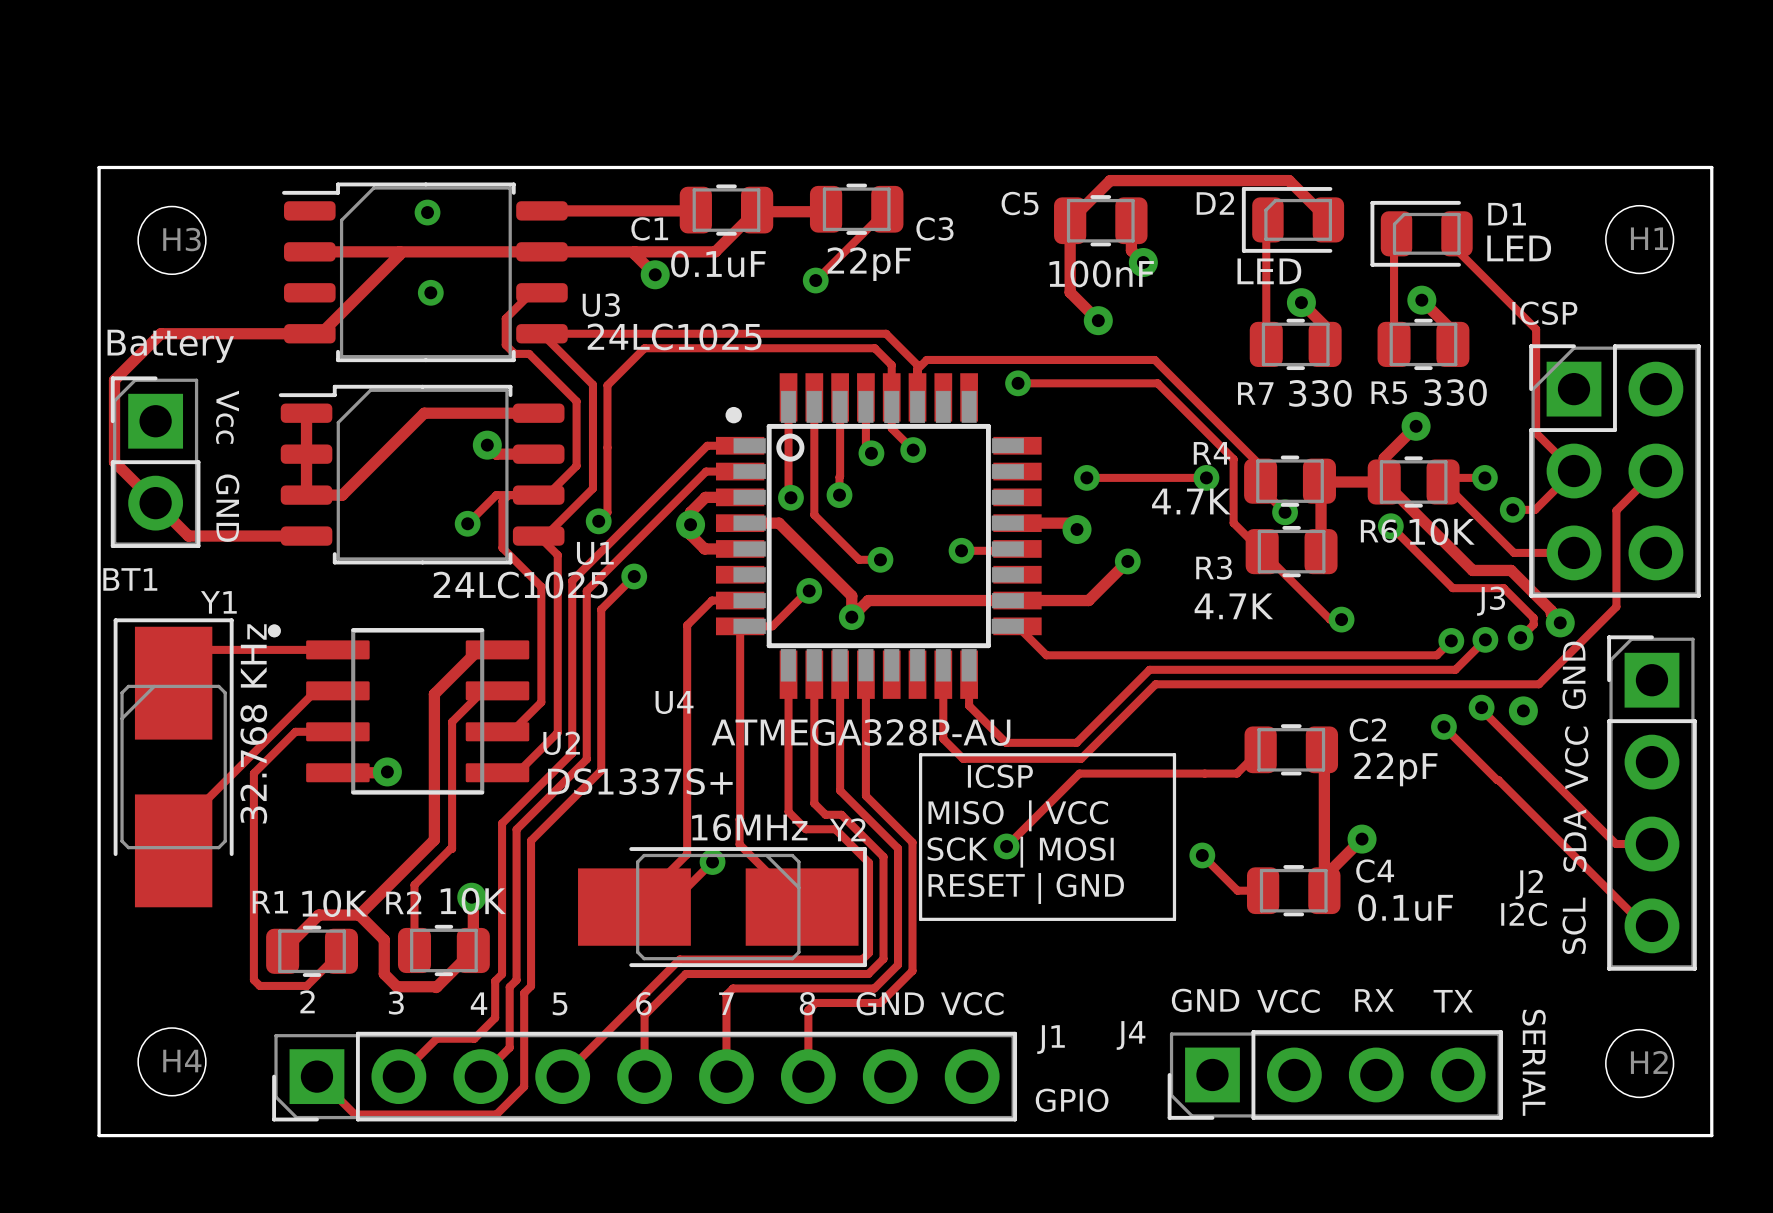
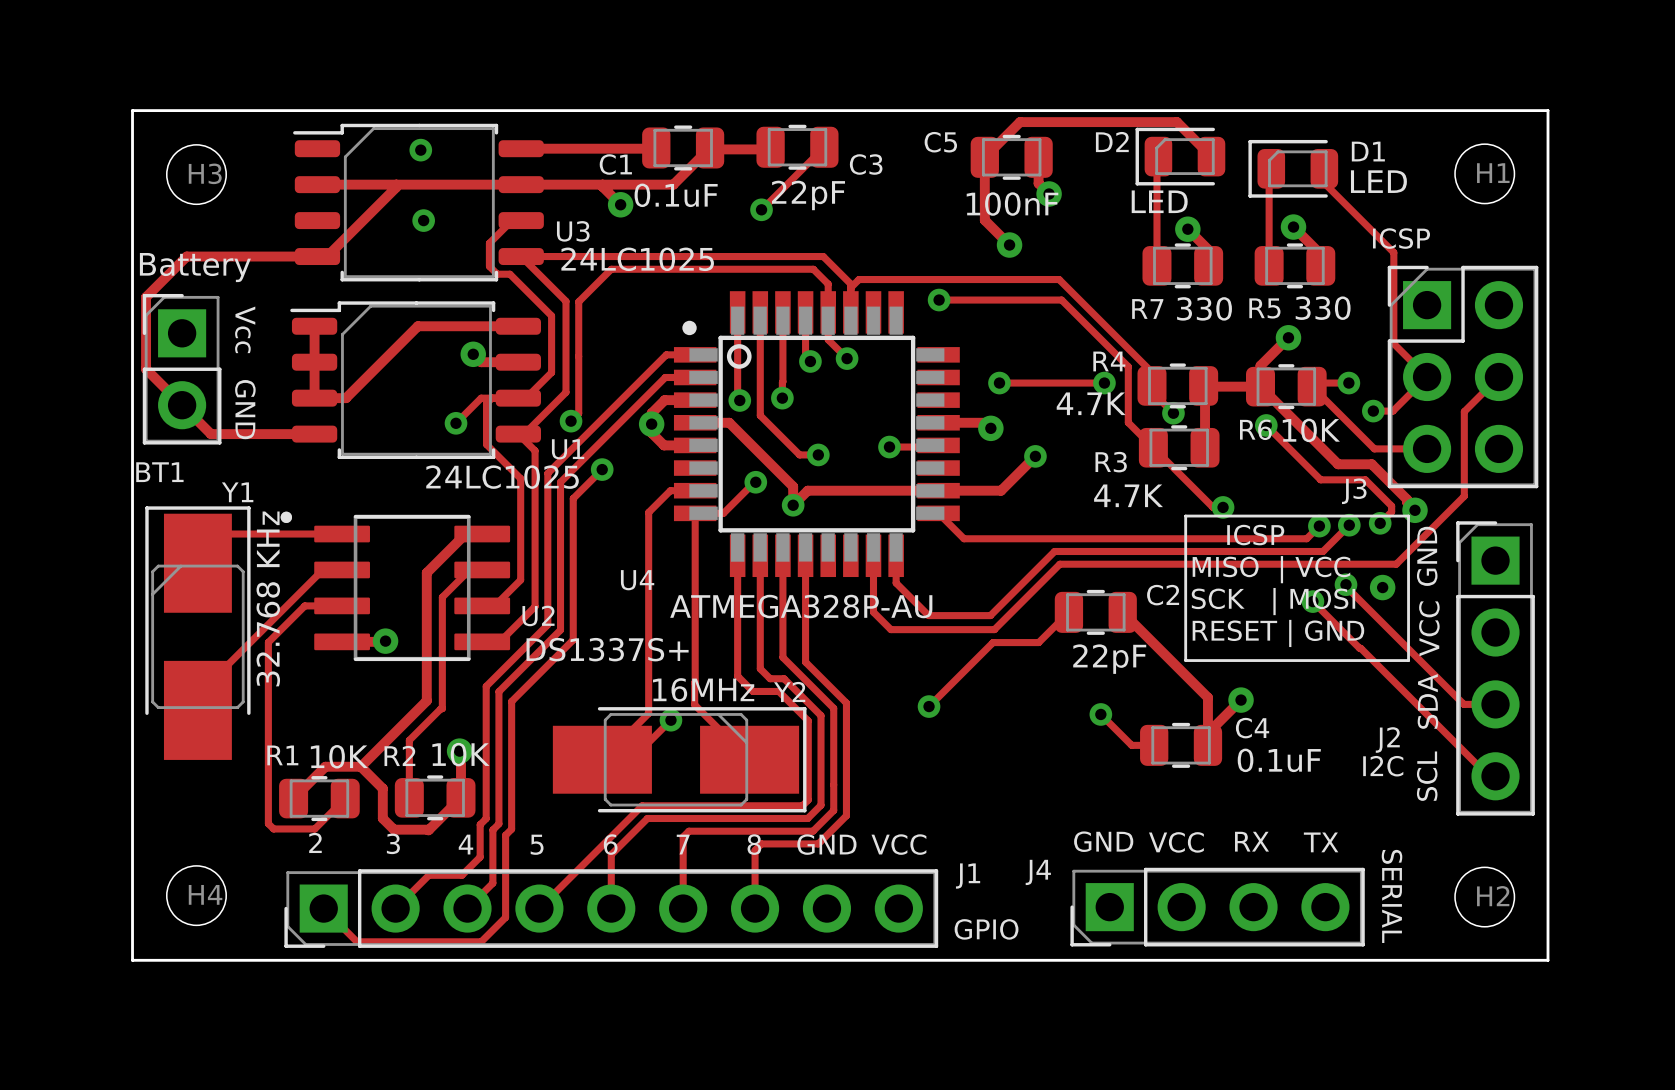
track: (1260, 749) (1236, 773) (1131, 773) -> (1068, 612) (1038, 642)
C2 position: (1291, 749) -> (1095, 612)
track: (1321, 749) (1324, 752) (1324, 836) -> (1122, 612) (1207, 697)
line: (920, 754) (1174, 754) (1174, 919) (920, 919) (920, 754) -> (1185, 516) (1408, 516) (1408, 660) (1185, 660) (1185, 516)
C2 value position: 22pF (1395, 769) -> 22pF (1109, 659)
text position: ICSP (1000, 776) -> ICSP (1255, 535)
text position: MISO | VCC (1018, 815) -> MISO | VCC (1271, 569)
text position: SCK | MOSI (1020, 852) -> SCK | MOSI (1273, 601)
text position: RESET | GND (1026, 888) -> RESET | GND (1278, 633)

